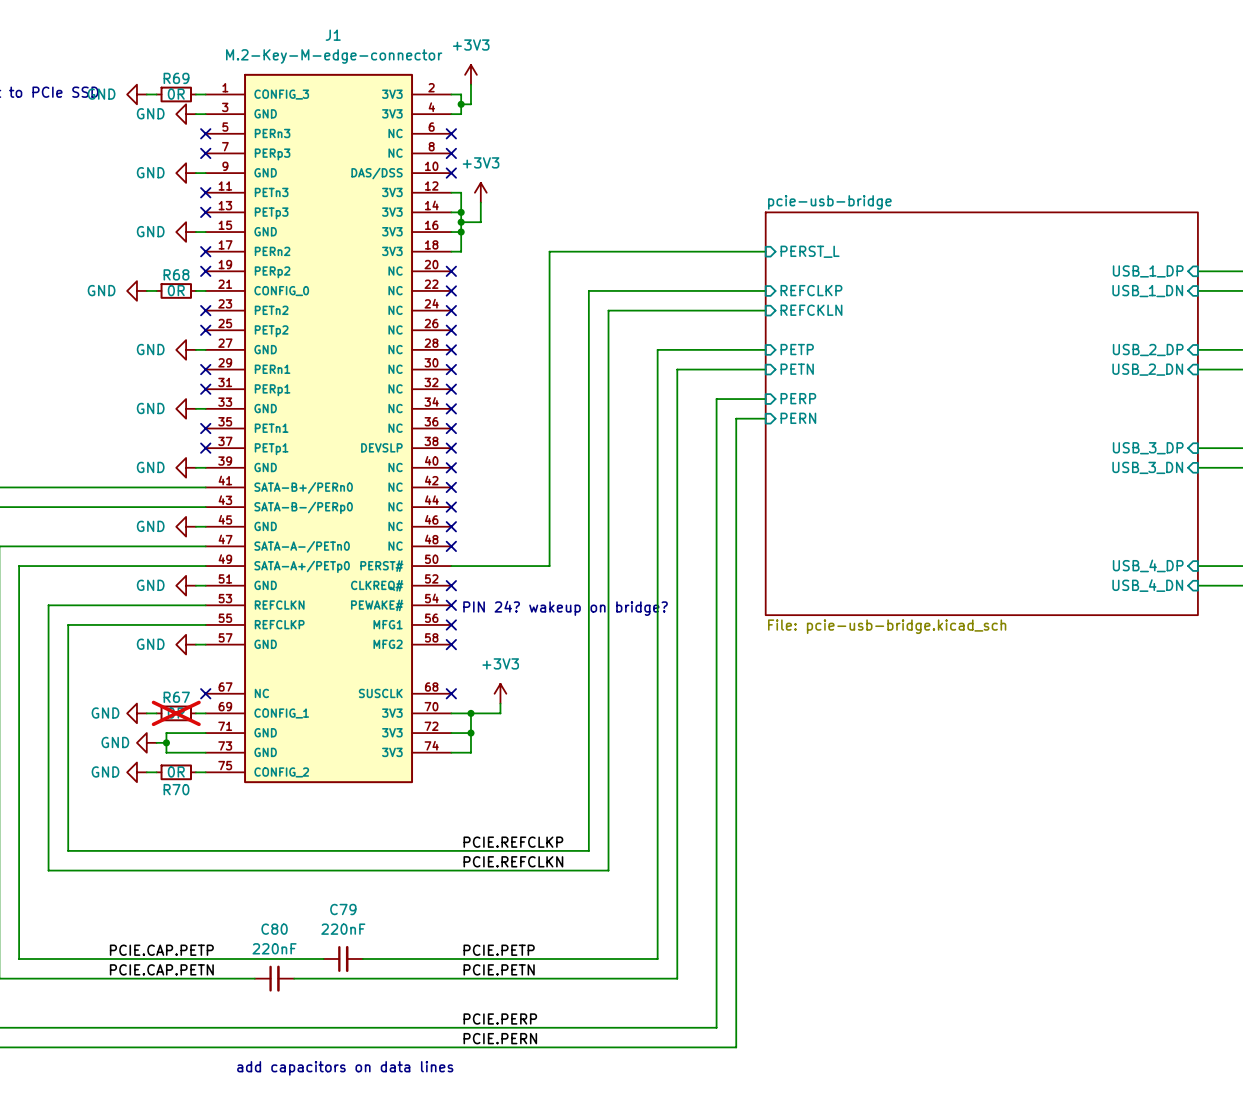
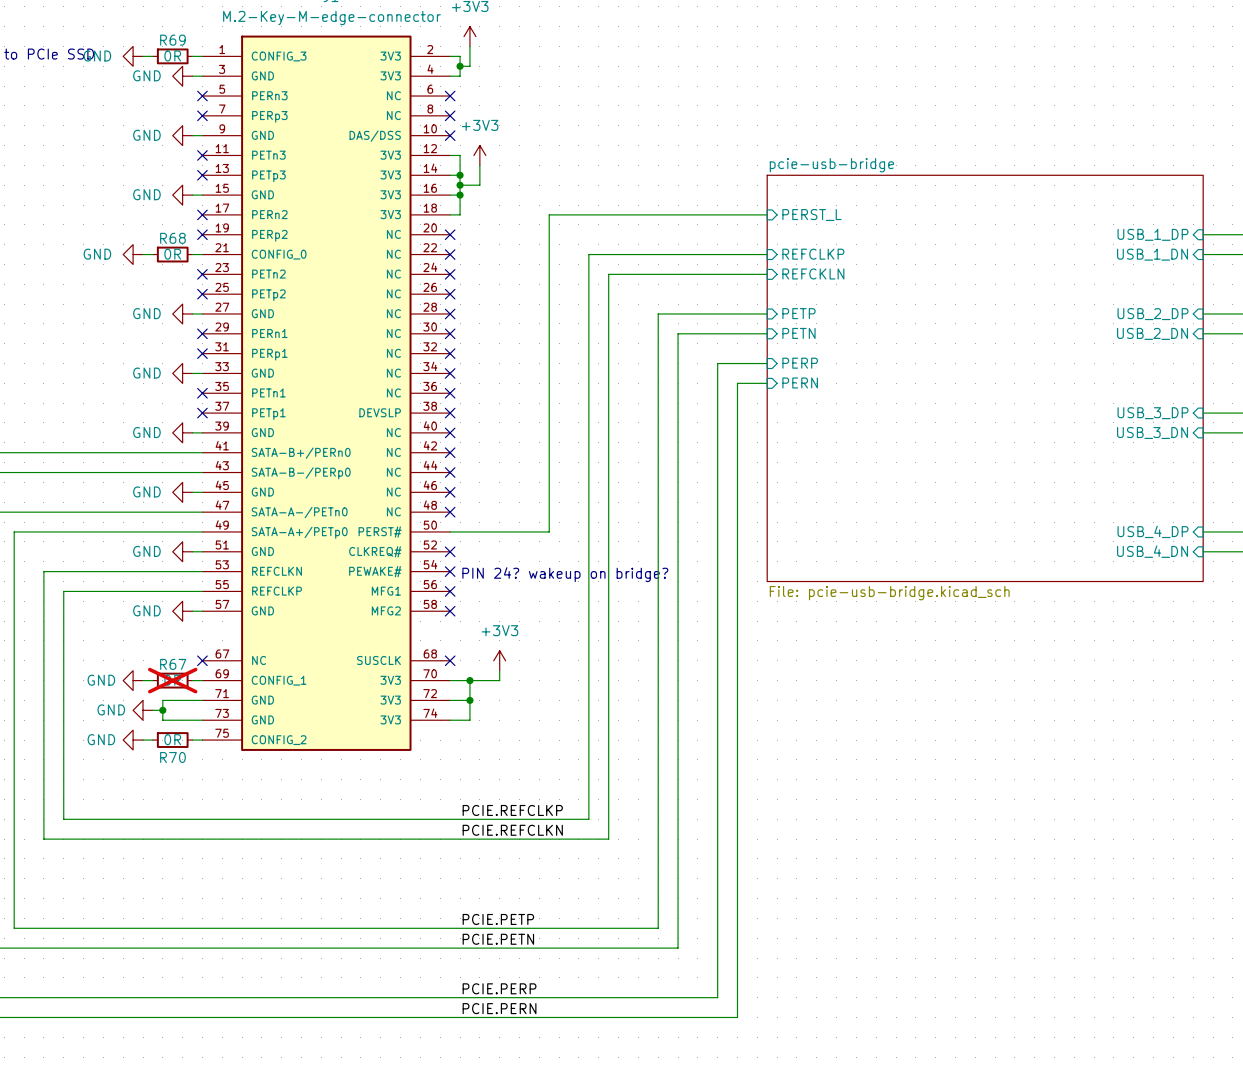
label: PCIE.CAP.PETP (161, 950) -> none
C79: (343, 958) -> none
label: PCIE.CAP.PETN (161, 969) -> none
C80: (274, 978) -> none
text: add capacitors on data lines (345, 1068) -> none

